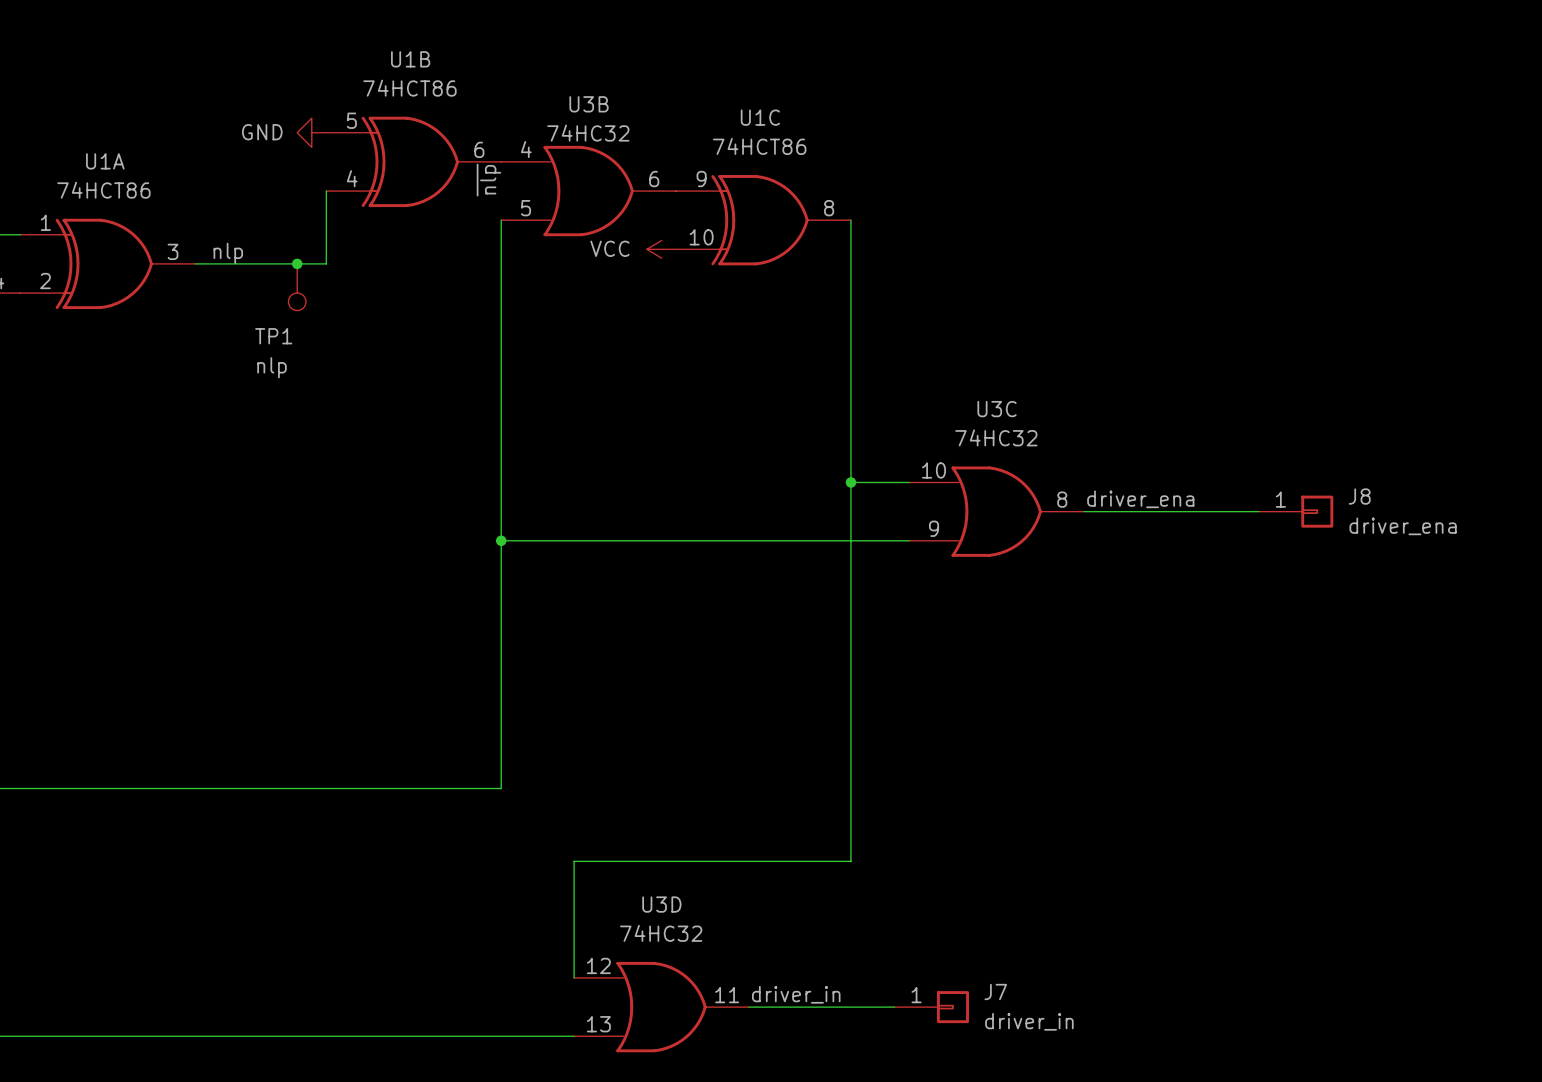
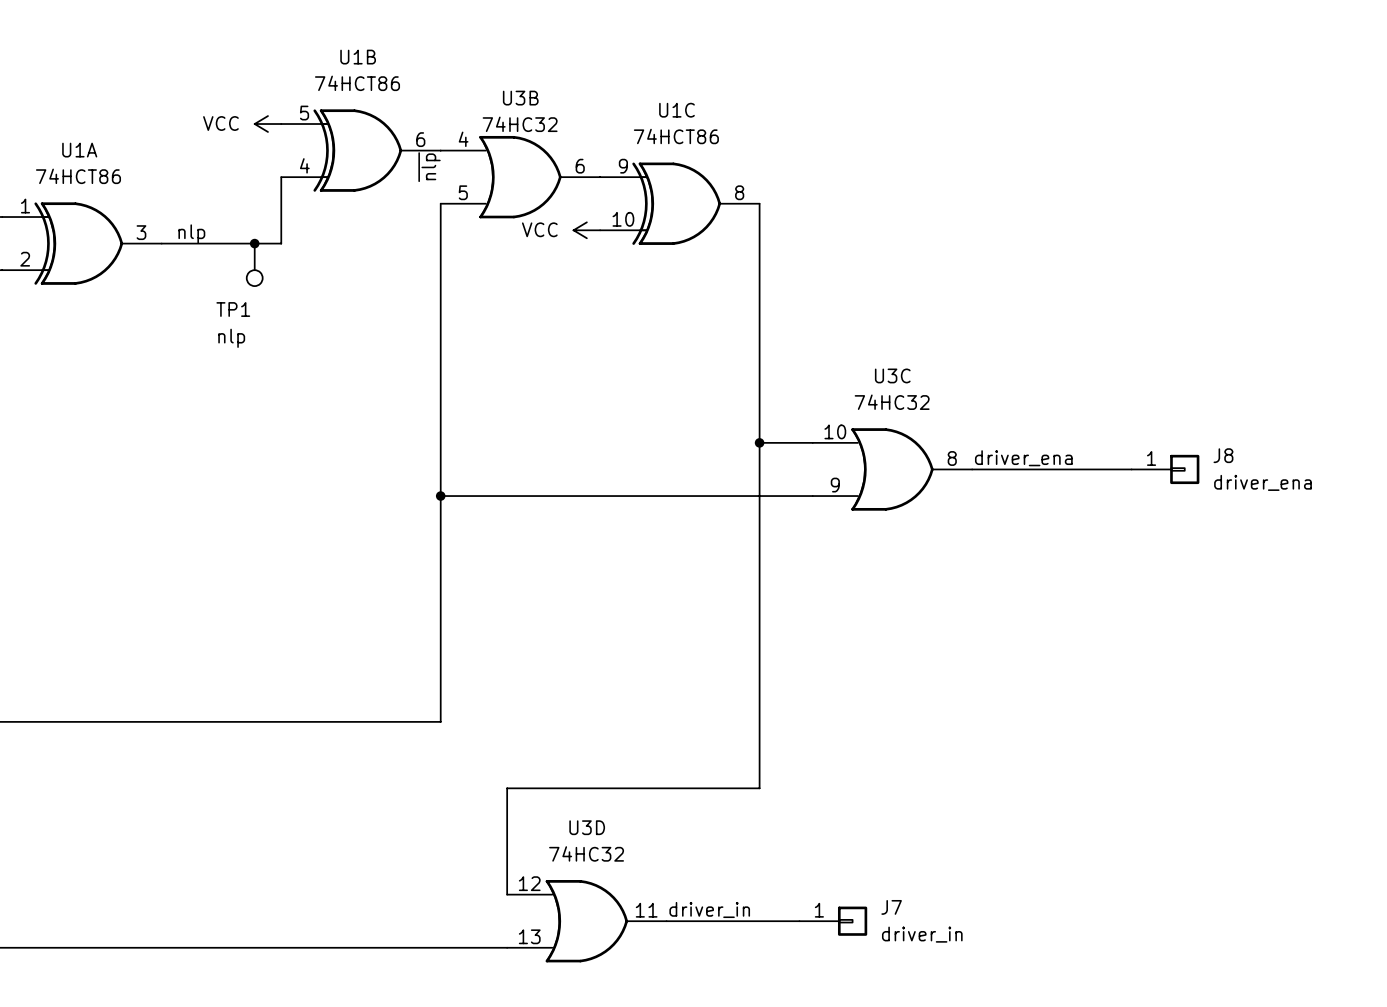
power symbol: GND (311, 132) -> VCC (267, 124)

